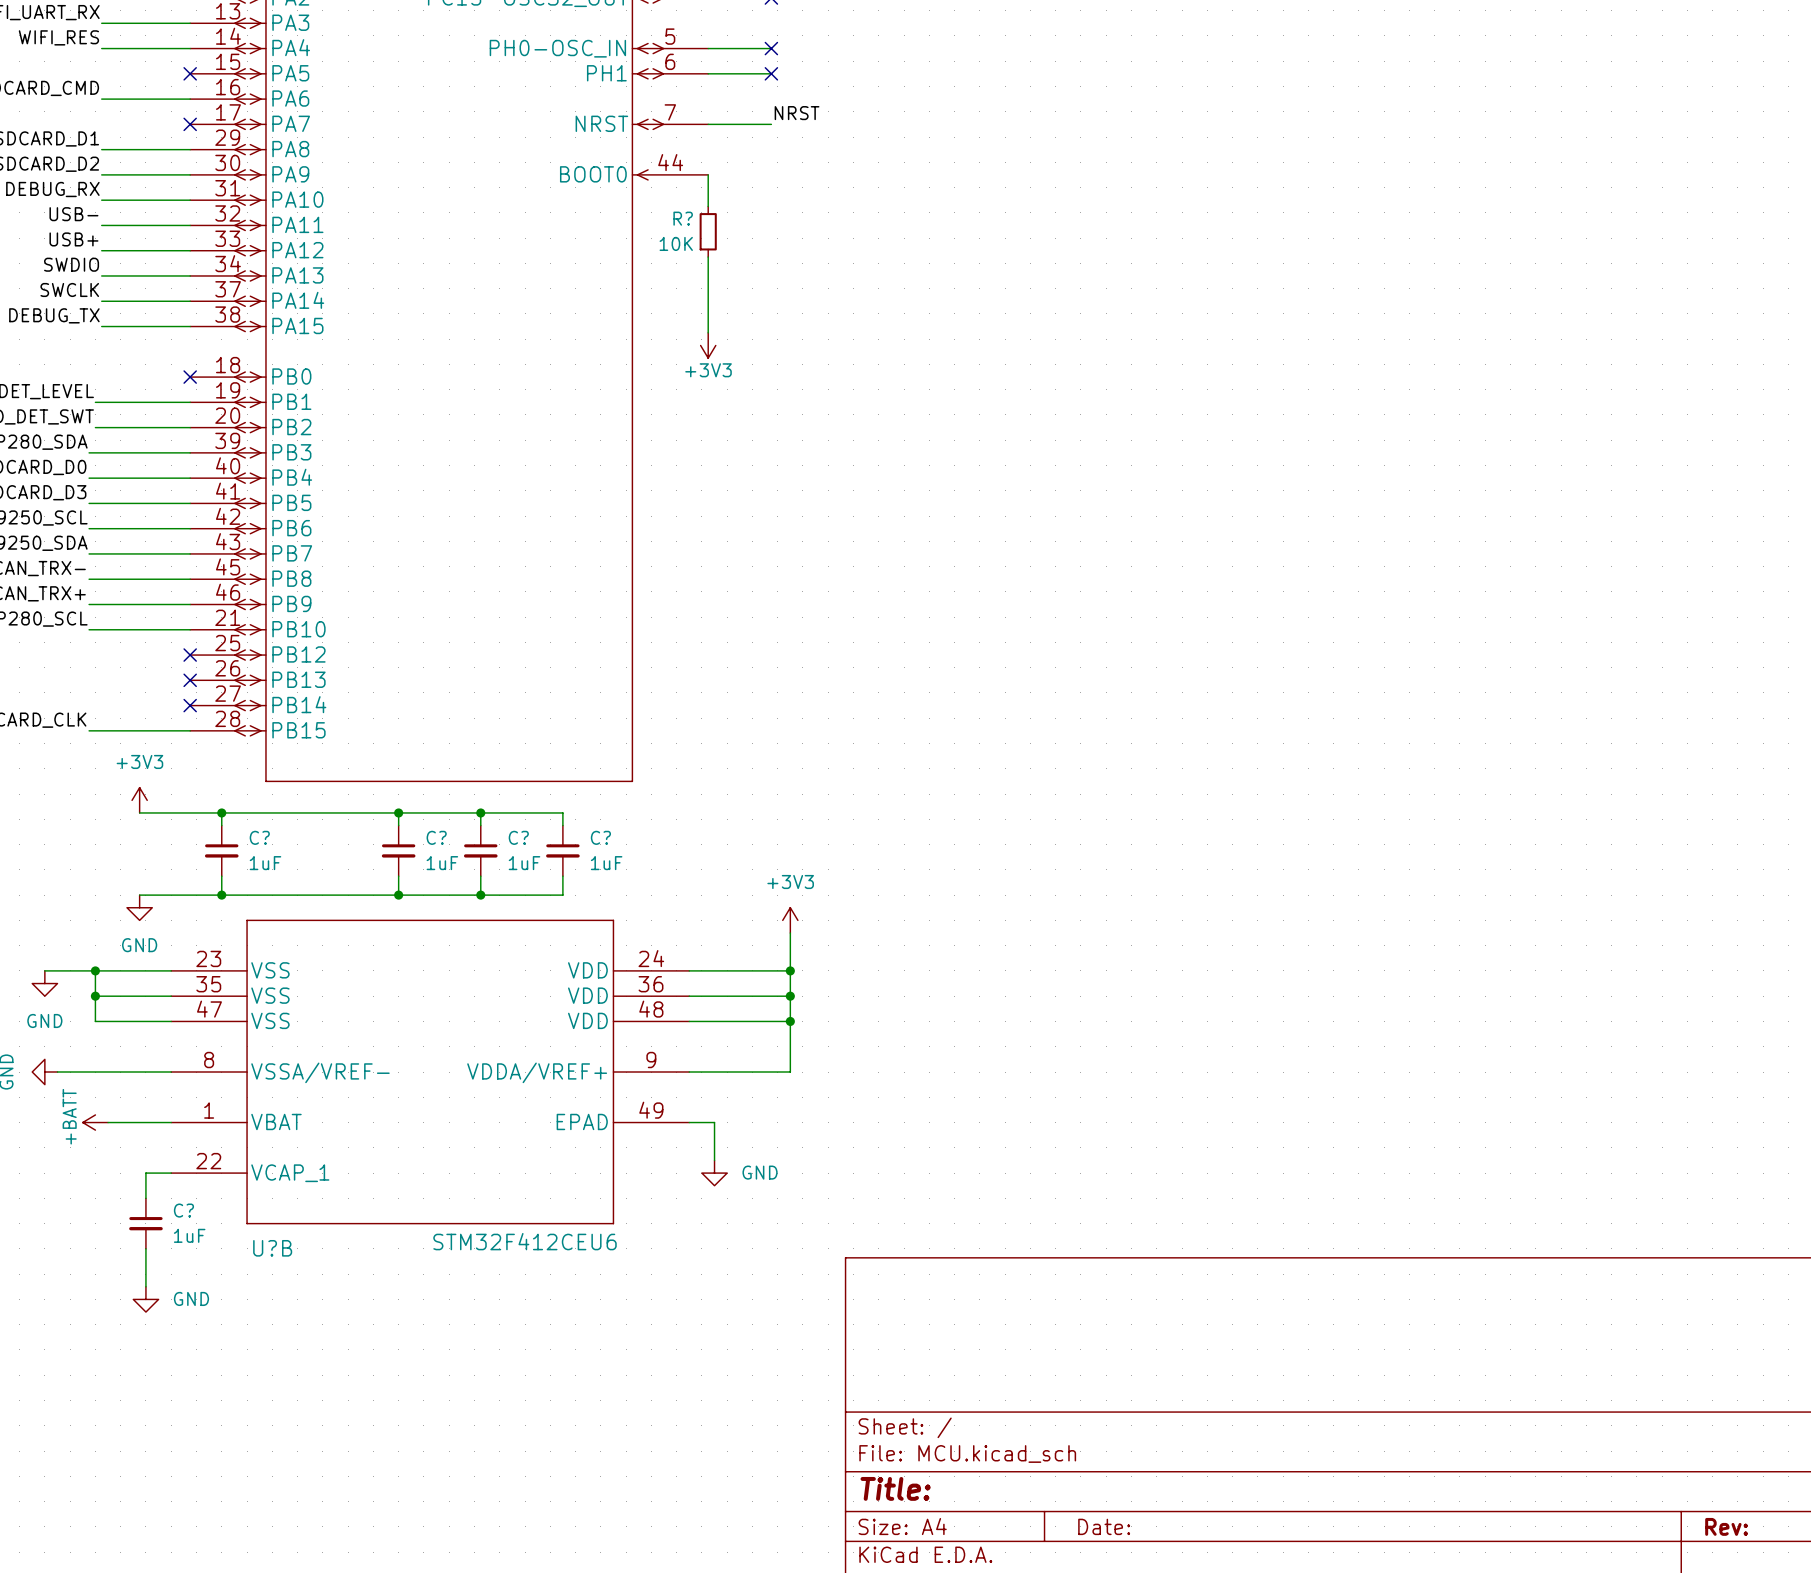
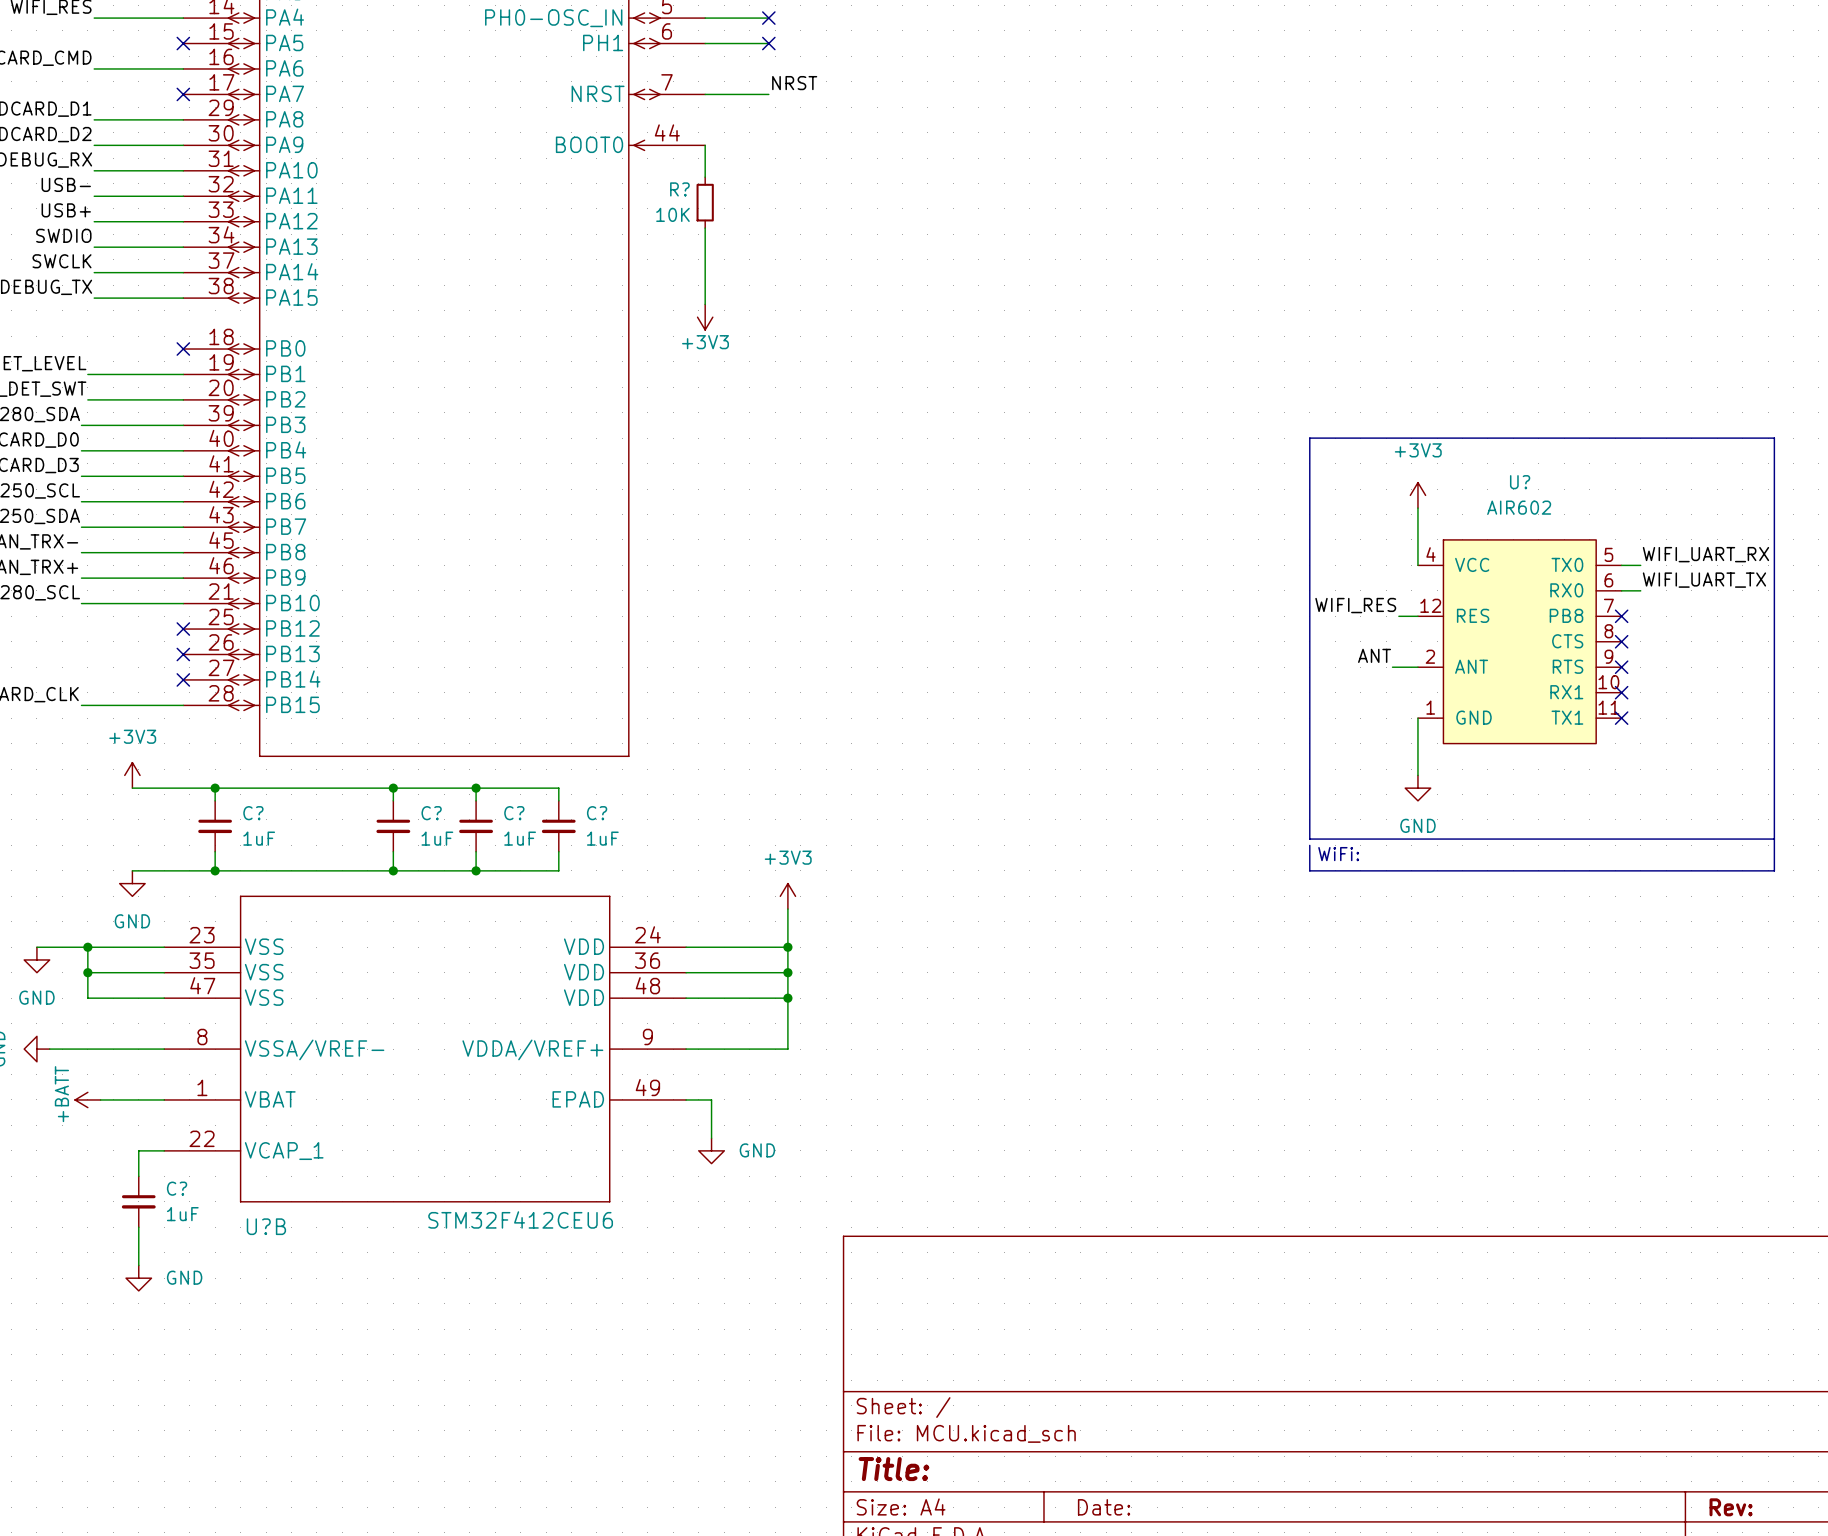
power symbol: none -> +3V3 (1417, 495)
wire: none -> (1417, 508) (1417, 565)
label: none -> WIFI_UART_RX (1705, 554)
wire: none -> (1621, 565) (1640, 565)
label: none -> WIFI_UART_TX (1704, 580)
wire: none -> (1621, 590) (1640, 590)
label: none -> WIFI_RES (1355, 605)
wire: none -> (1398, 616) (1417, 616)
no-connect mark: none -> (1621, 616)
U?: none -> AIR602 (1519, 641)
no-connect mark: none -> (1621, 641)
label: none -> ANT (1374, 655)
wire: none -> (1392, 667) (1417, 667)
no-connect mark: none -> (1621, 667)
no-connect mark: none -> (1621, 692)
wire: none -> (1417, 718) (1417, 775)
no-connect mark: none -> (1621, 718)
power symbol: none -> GND (1417, 788)
line: none -> (1774, 839) (1309, 839) (1309, 438) (1774, 438) (1774, 870) (1309, 870) (1309, 845)
text: none -> WiFi: (1338, 854)

